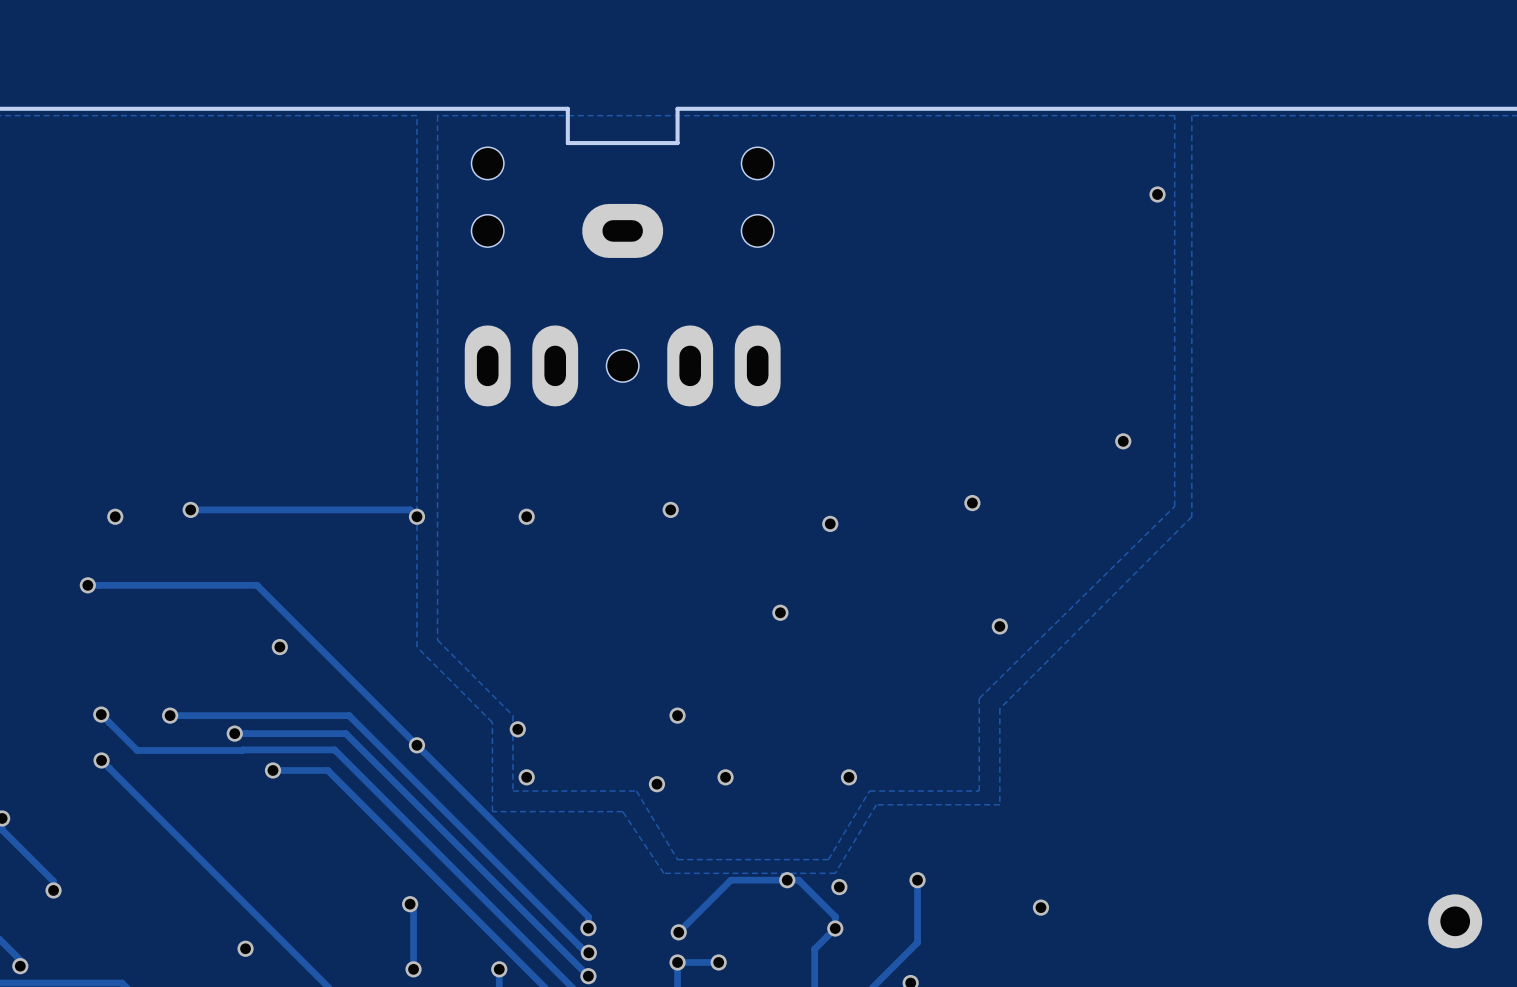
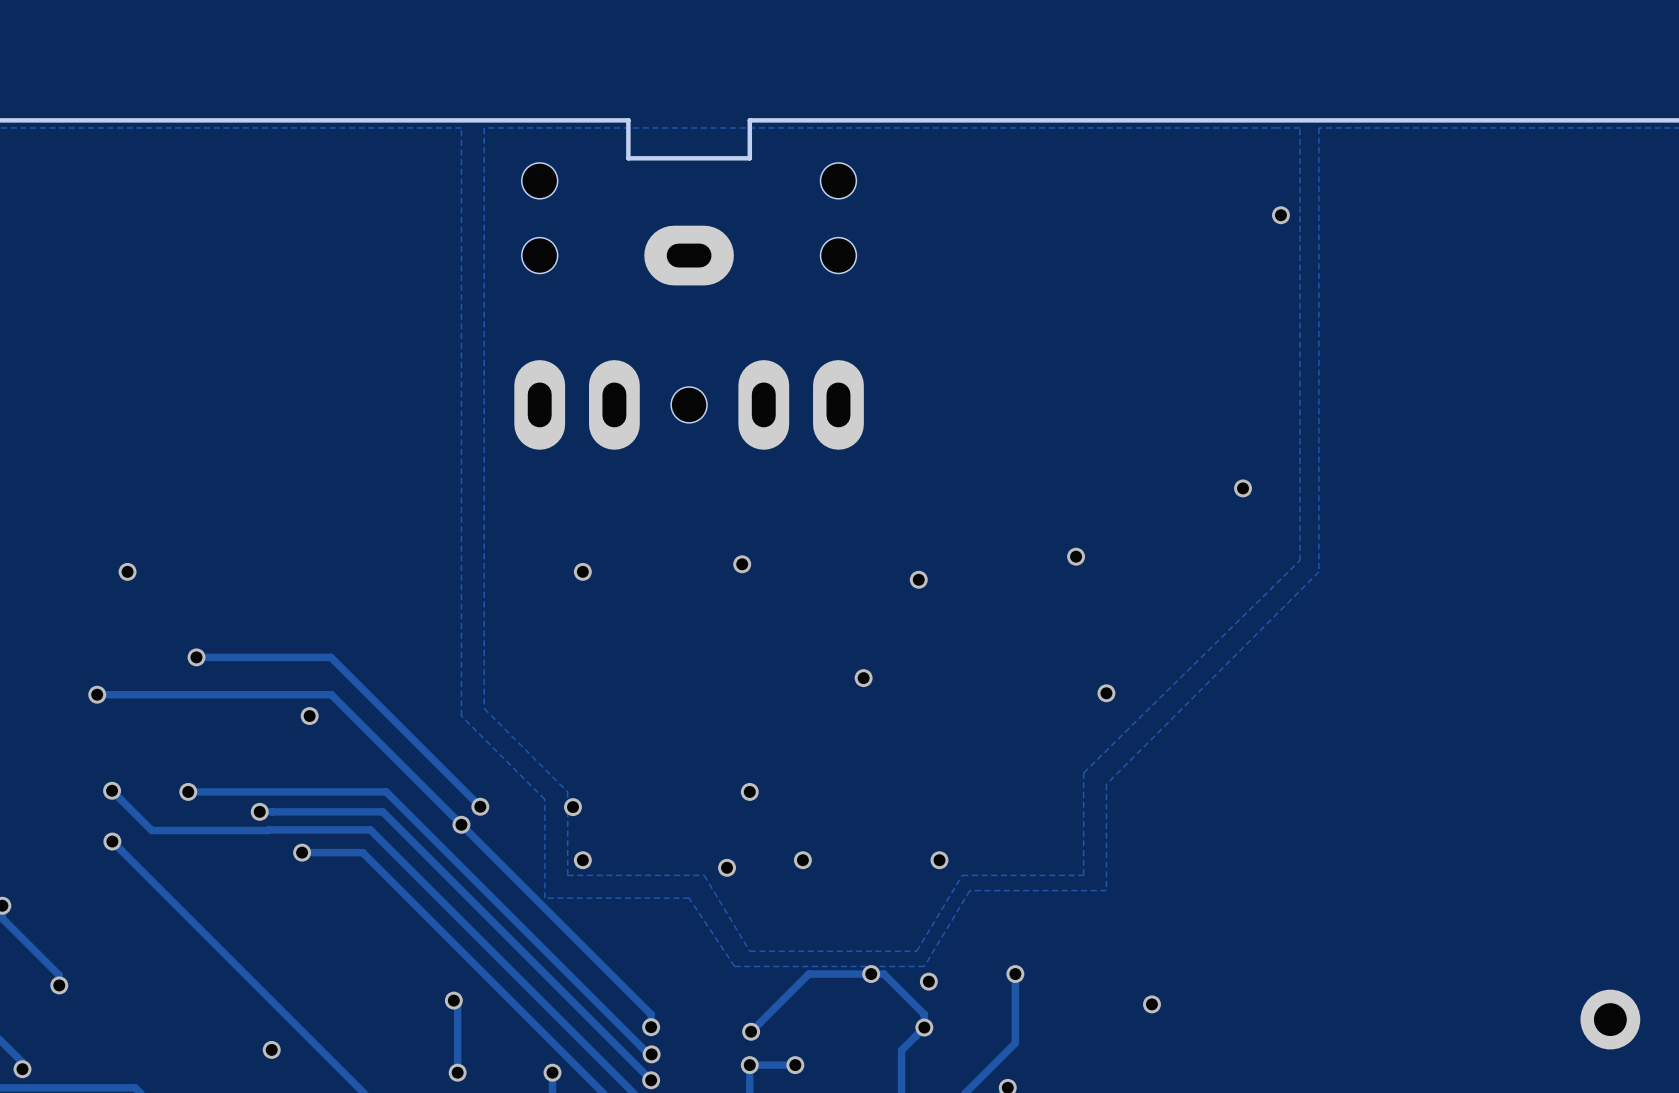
track: (190, 509) (410, 509) (416, 516) -> none
via: (190, 509) -> none
via: (416, 516) -> none
track: (87, 585) (257, 585) (299, 627) -> (97, 694) (331, 694)
via position: (87, 585) -> (97, 694)
track: none -> (196, 657) (330, 657) (480, 806)
via: none -> (196, 657)
via: none -> (480, 806)

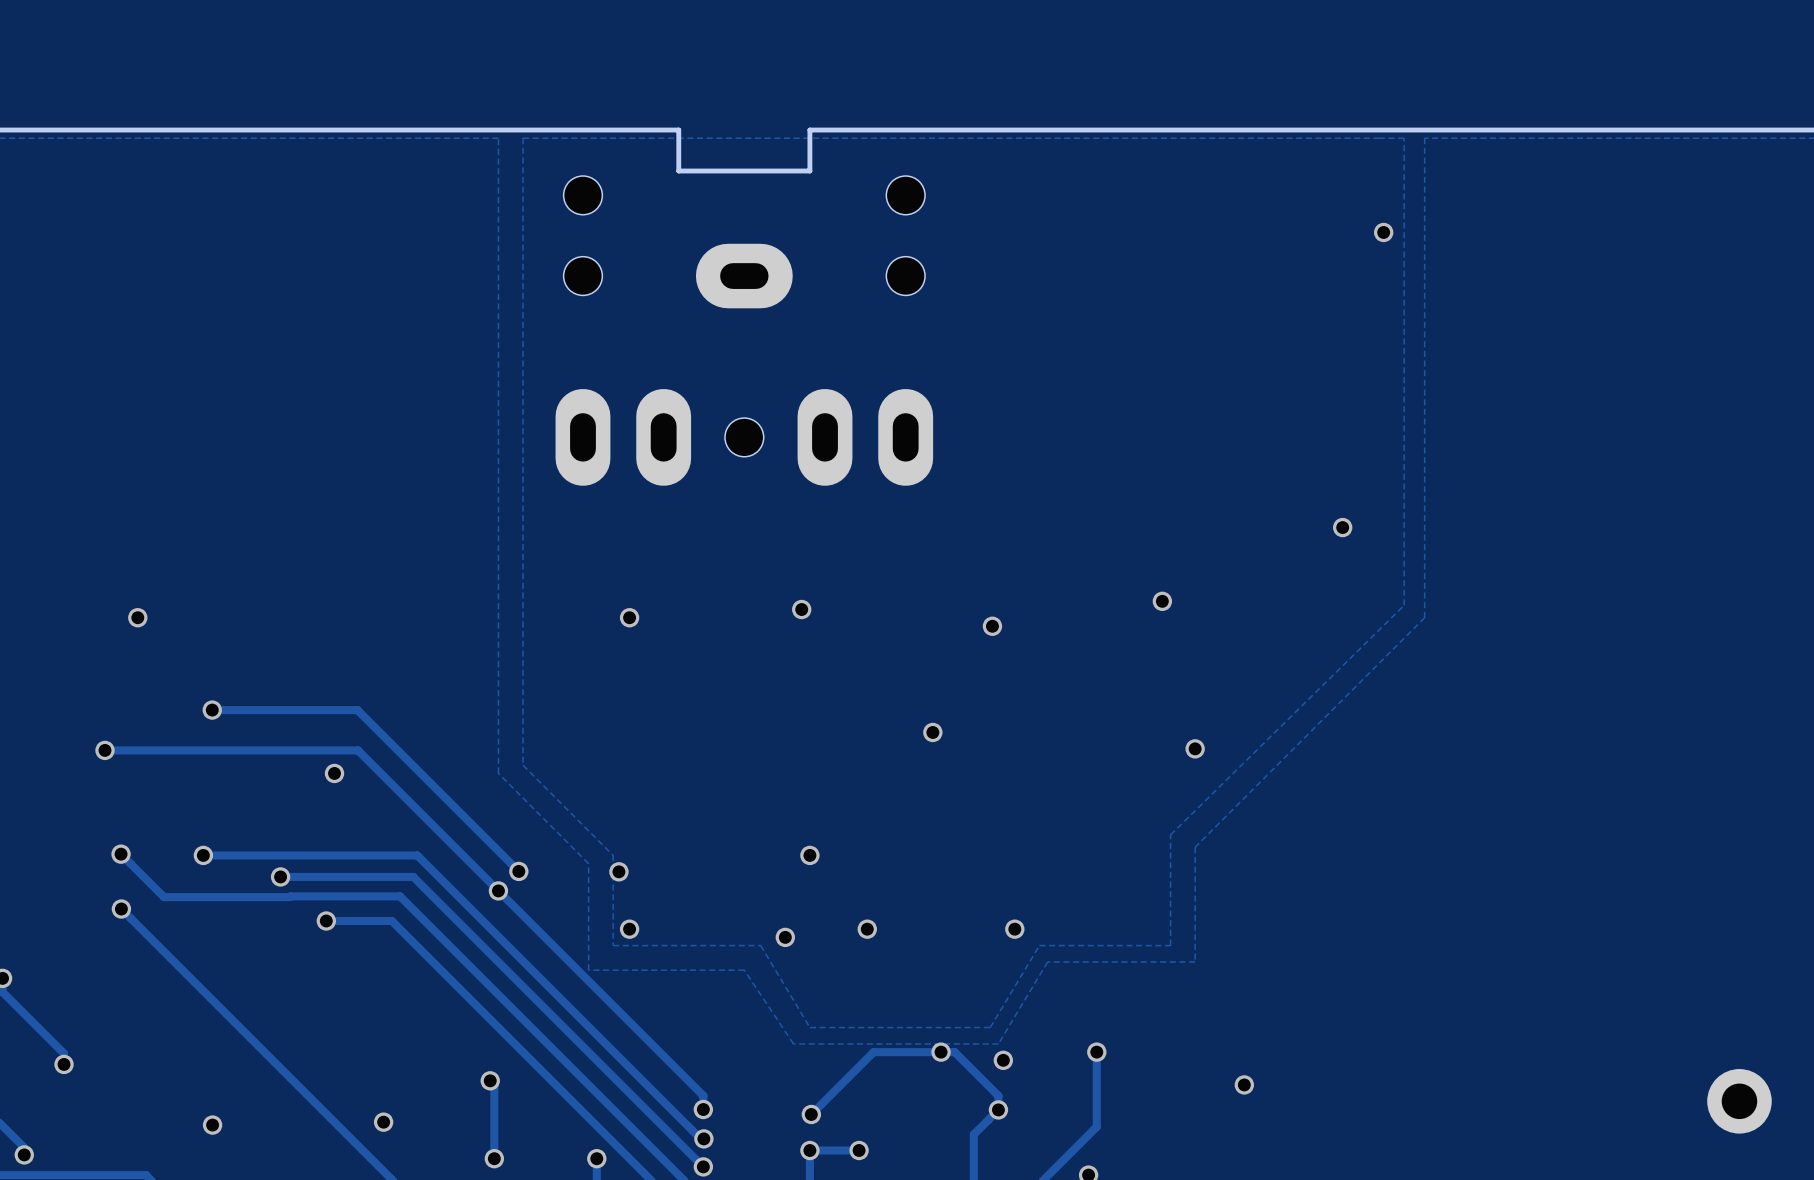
via: none -> (383, 1122)
via: none -> (212, 1125)
via: (271, 1049) -> none

